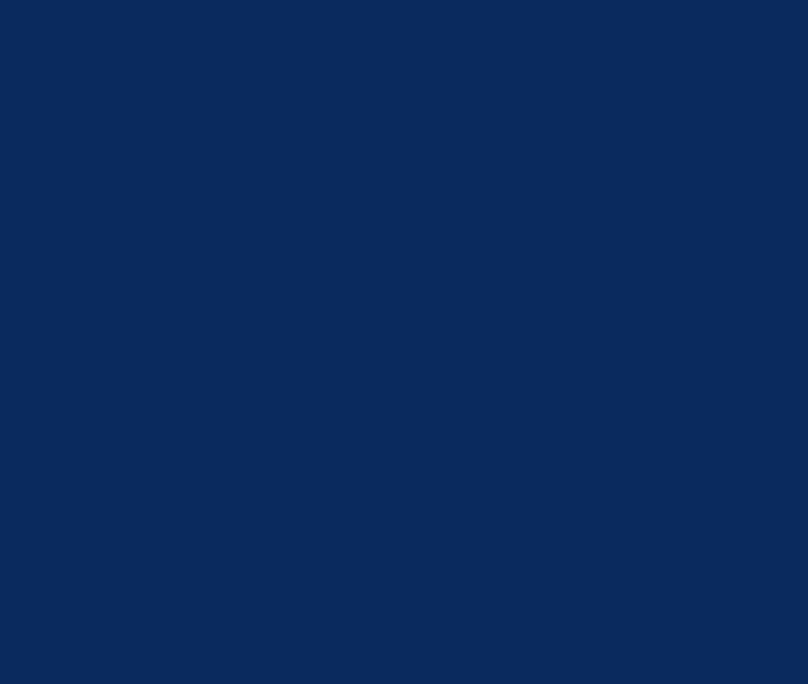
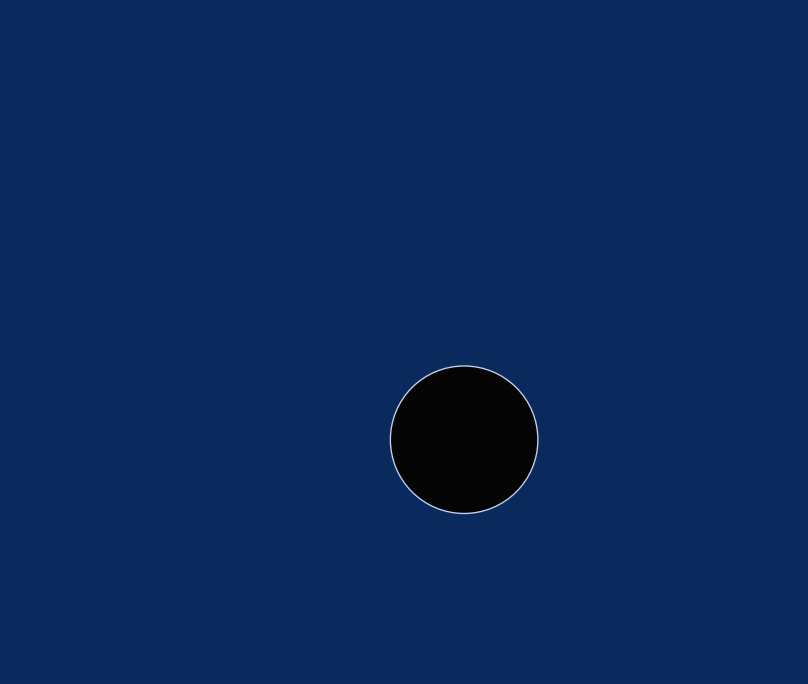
part: none -> (464, 439)

